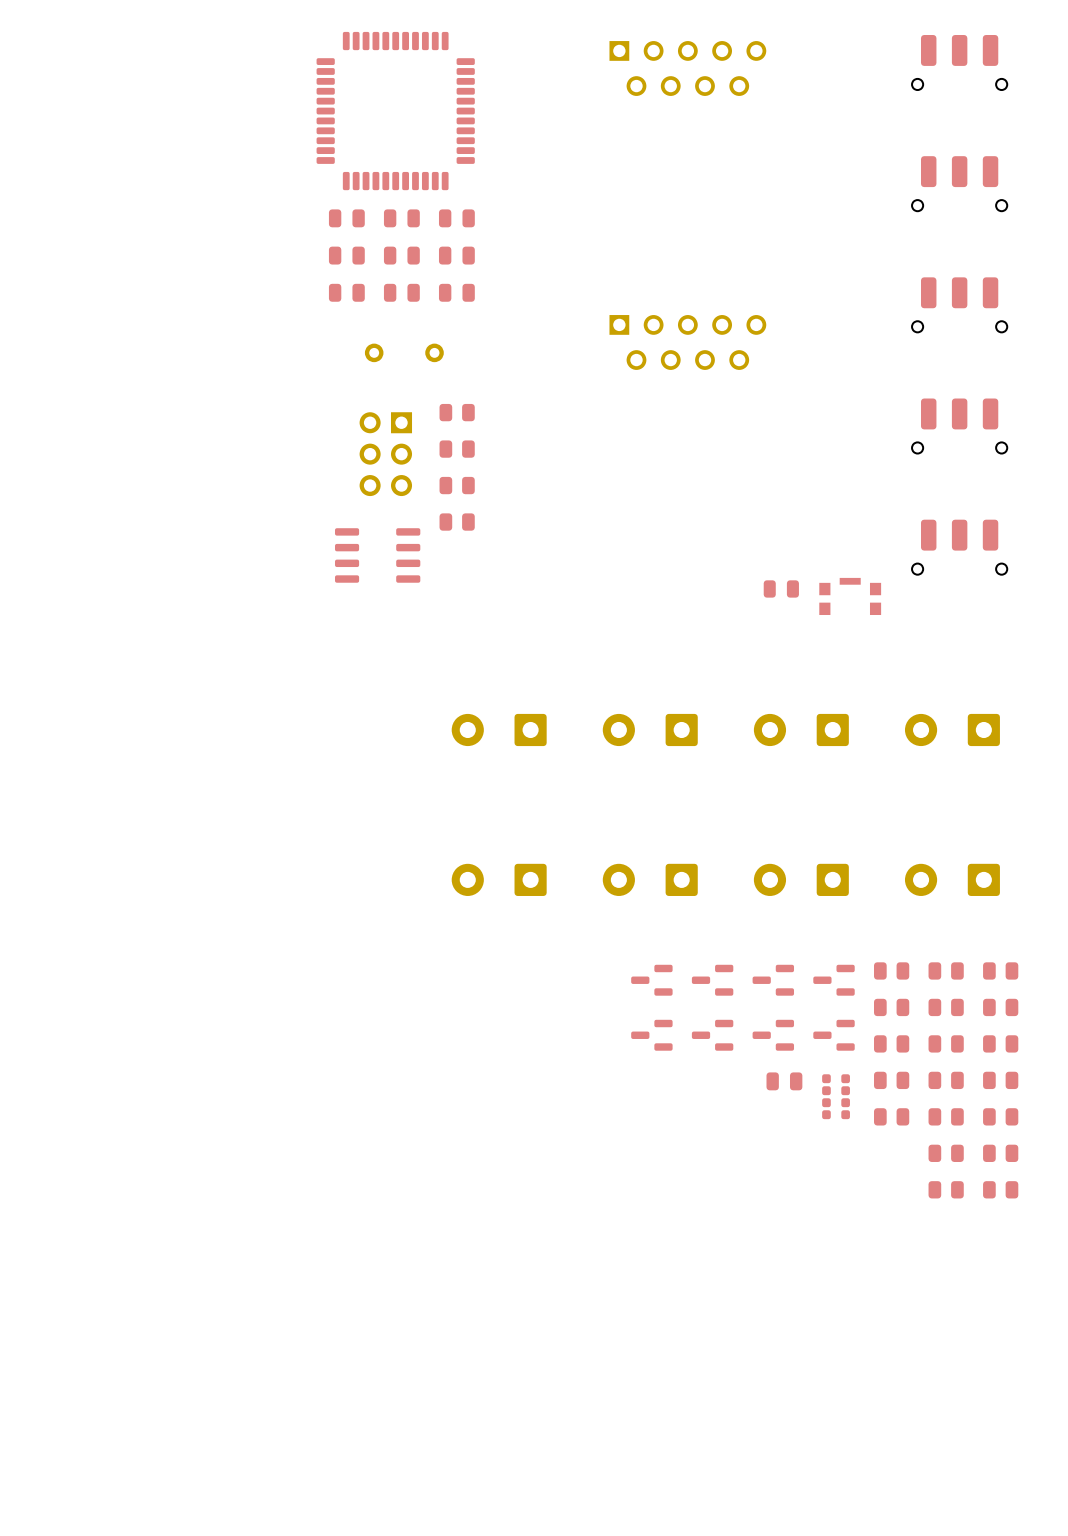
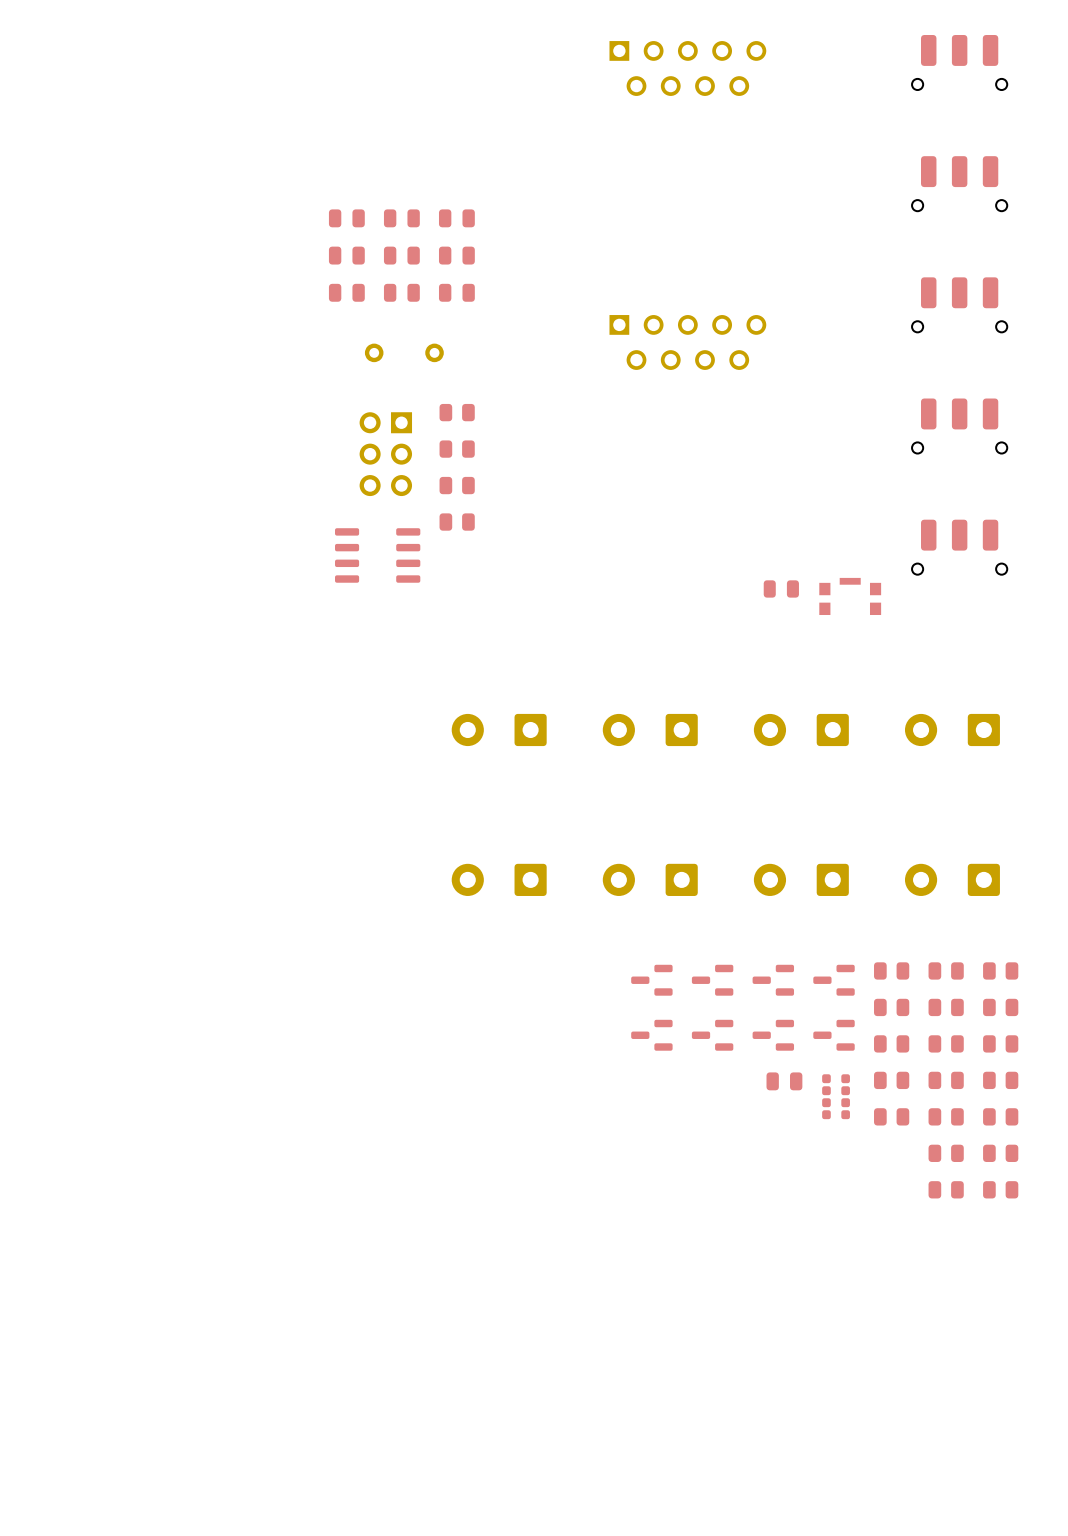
part: (395, 111) -> none

